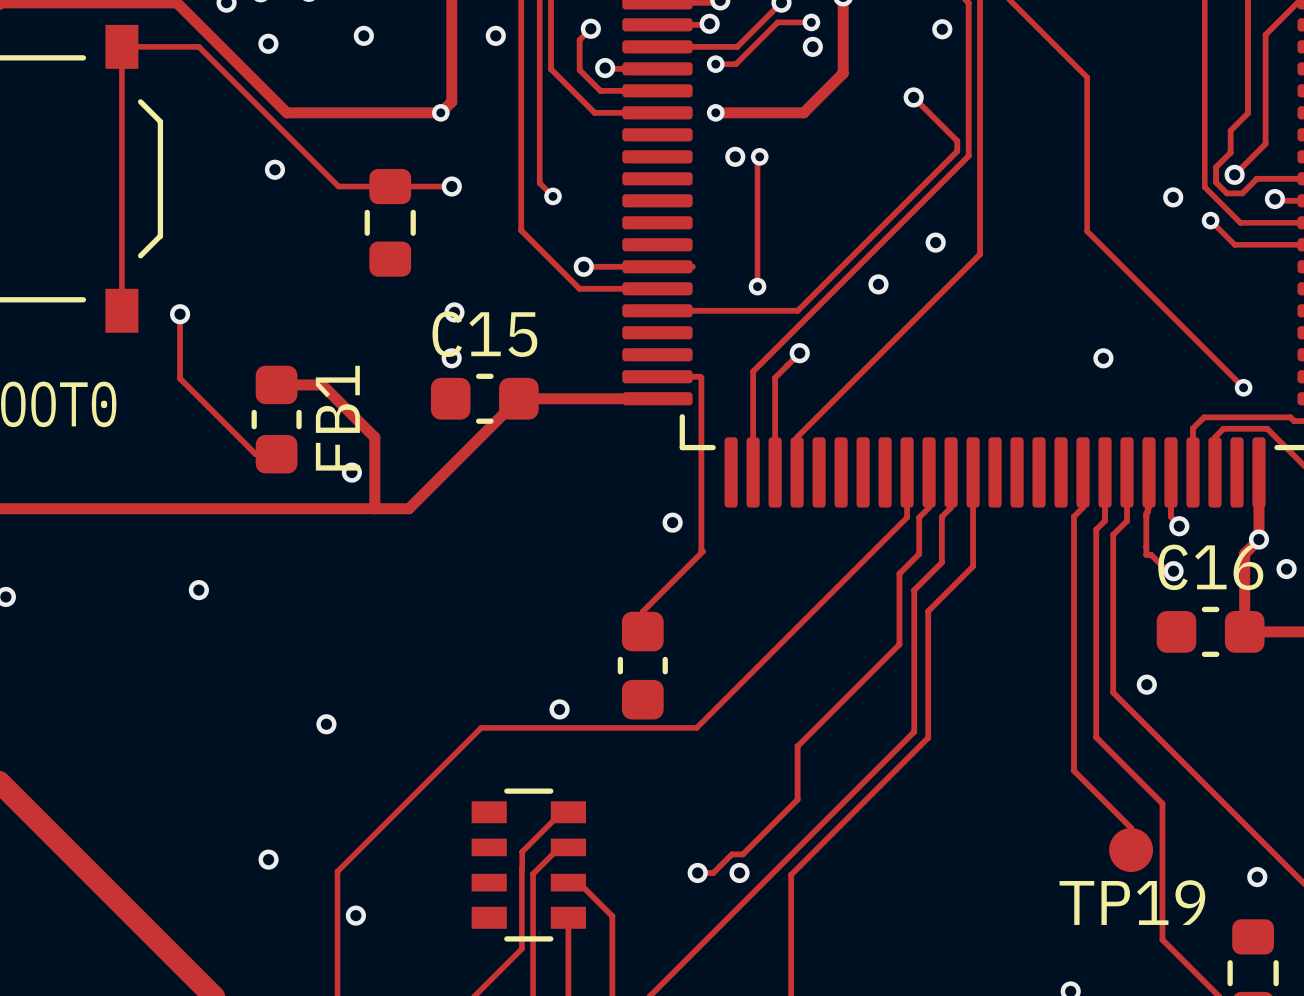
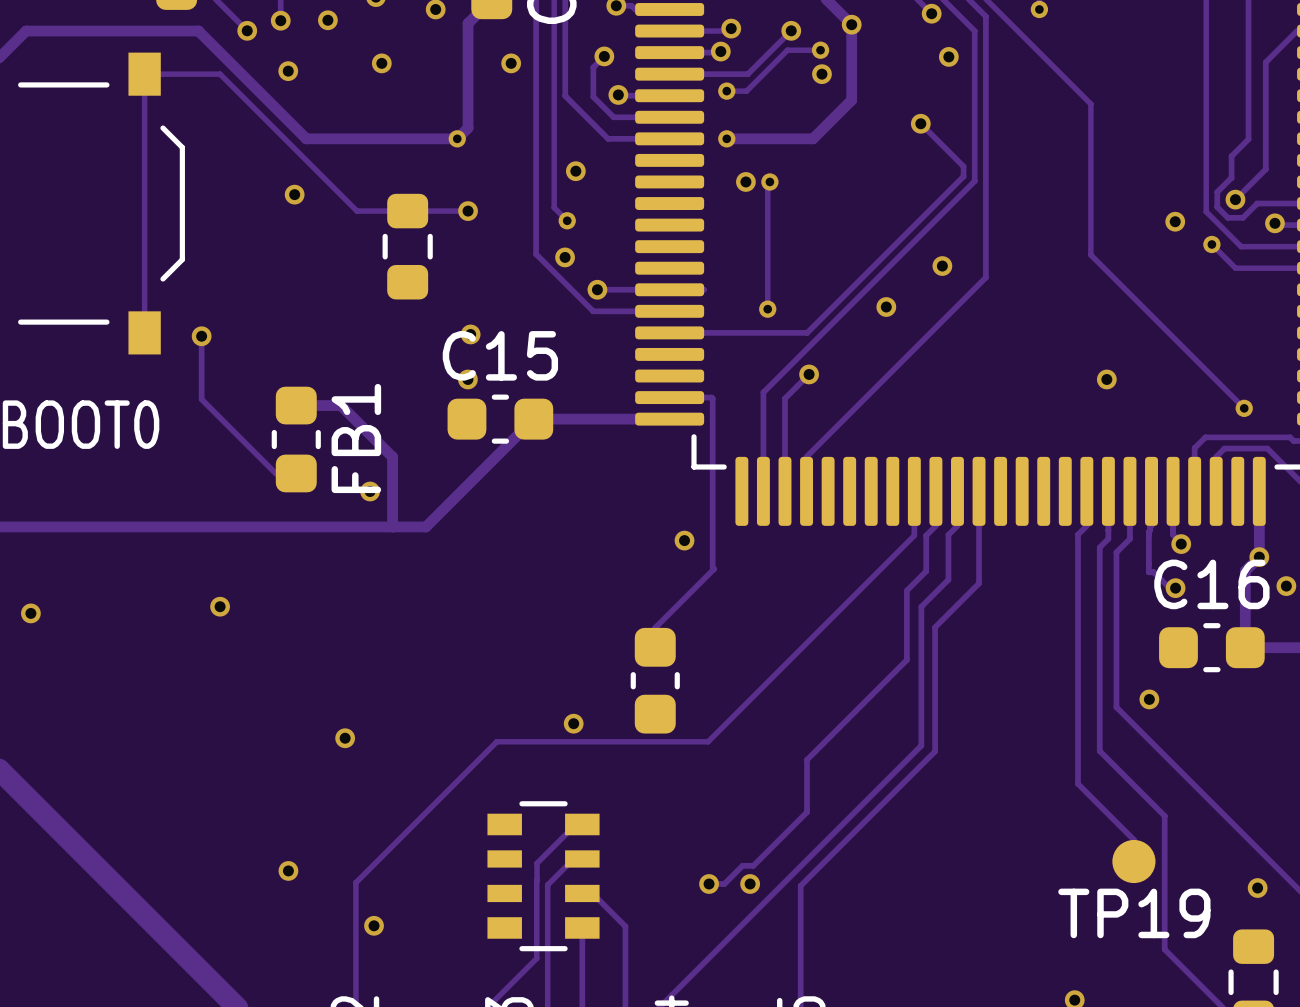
via: none -> (575, 171)
via: none -> (565, 257)

